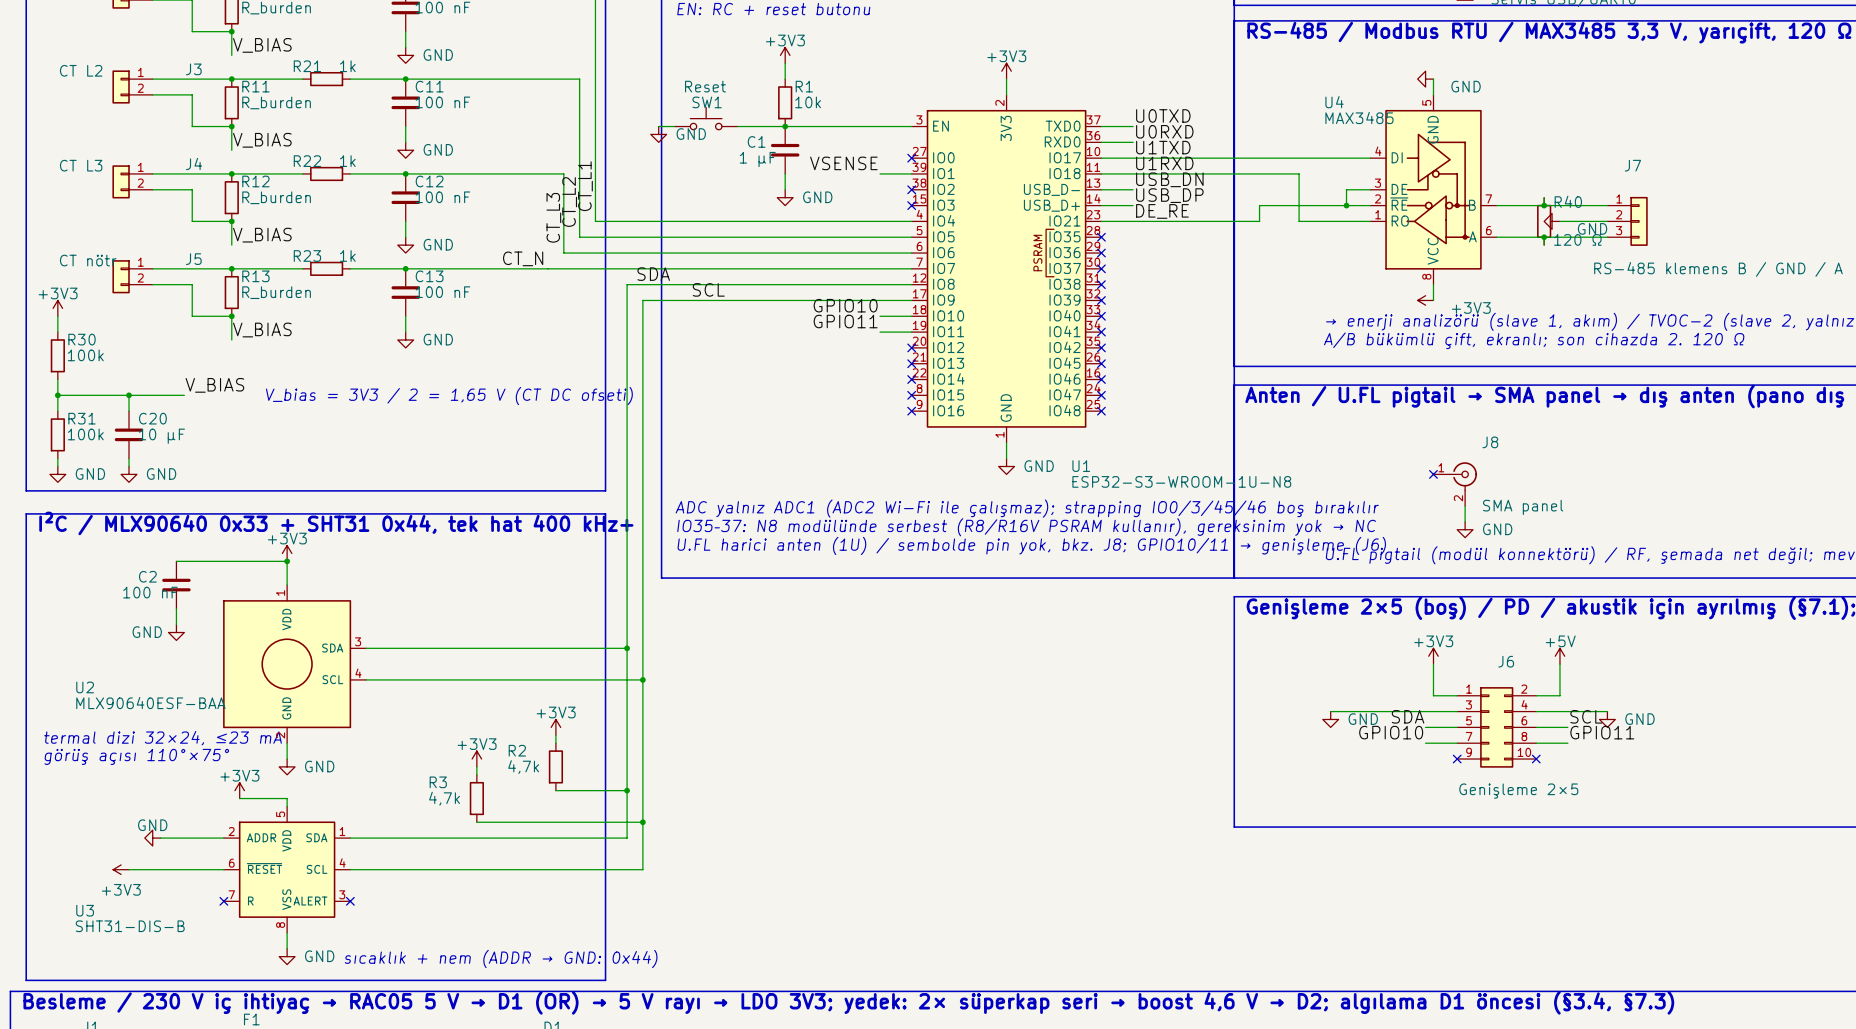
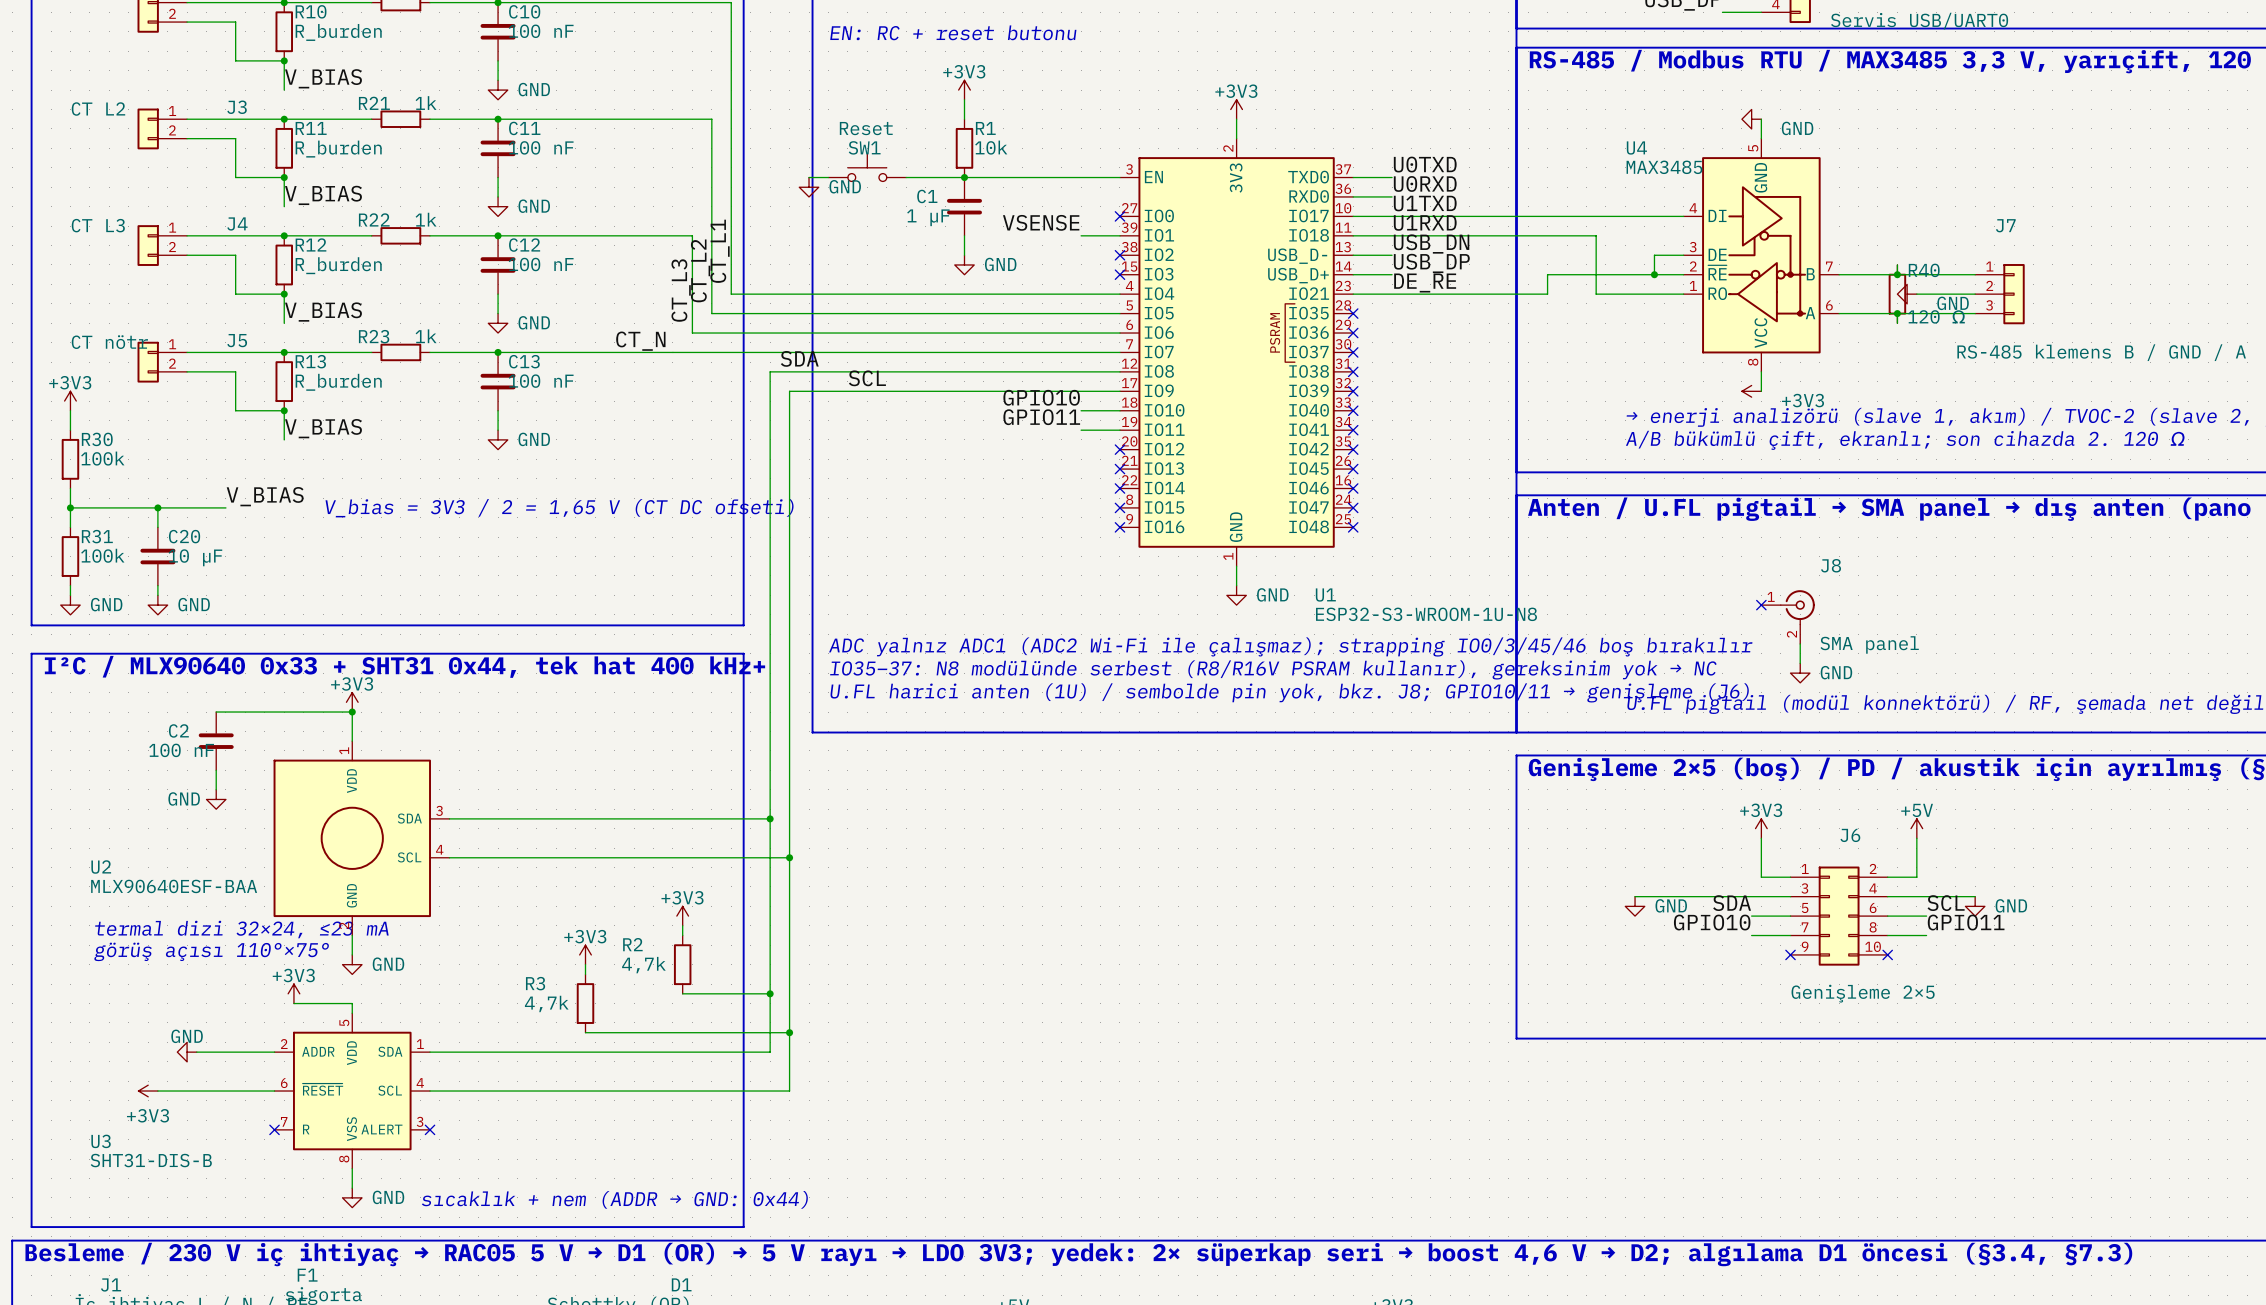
text position: termal dizi 32×24, ≤23 mA (163, 738) -> termal dizi 32×24, ≤23 mA (241, 929)
text position: görüş açısı 110°×75° (136, 756) -> görüş açısı 110°×75° (211, 951)

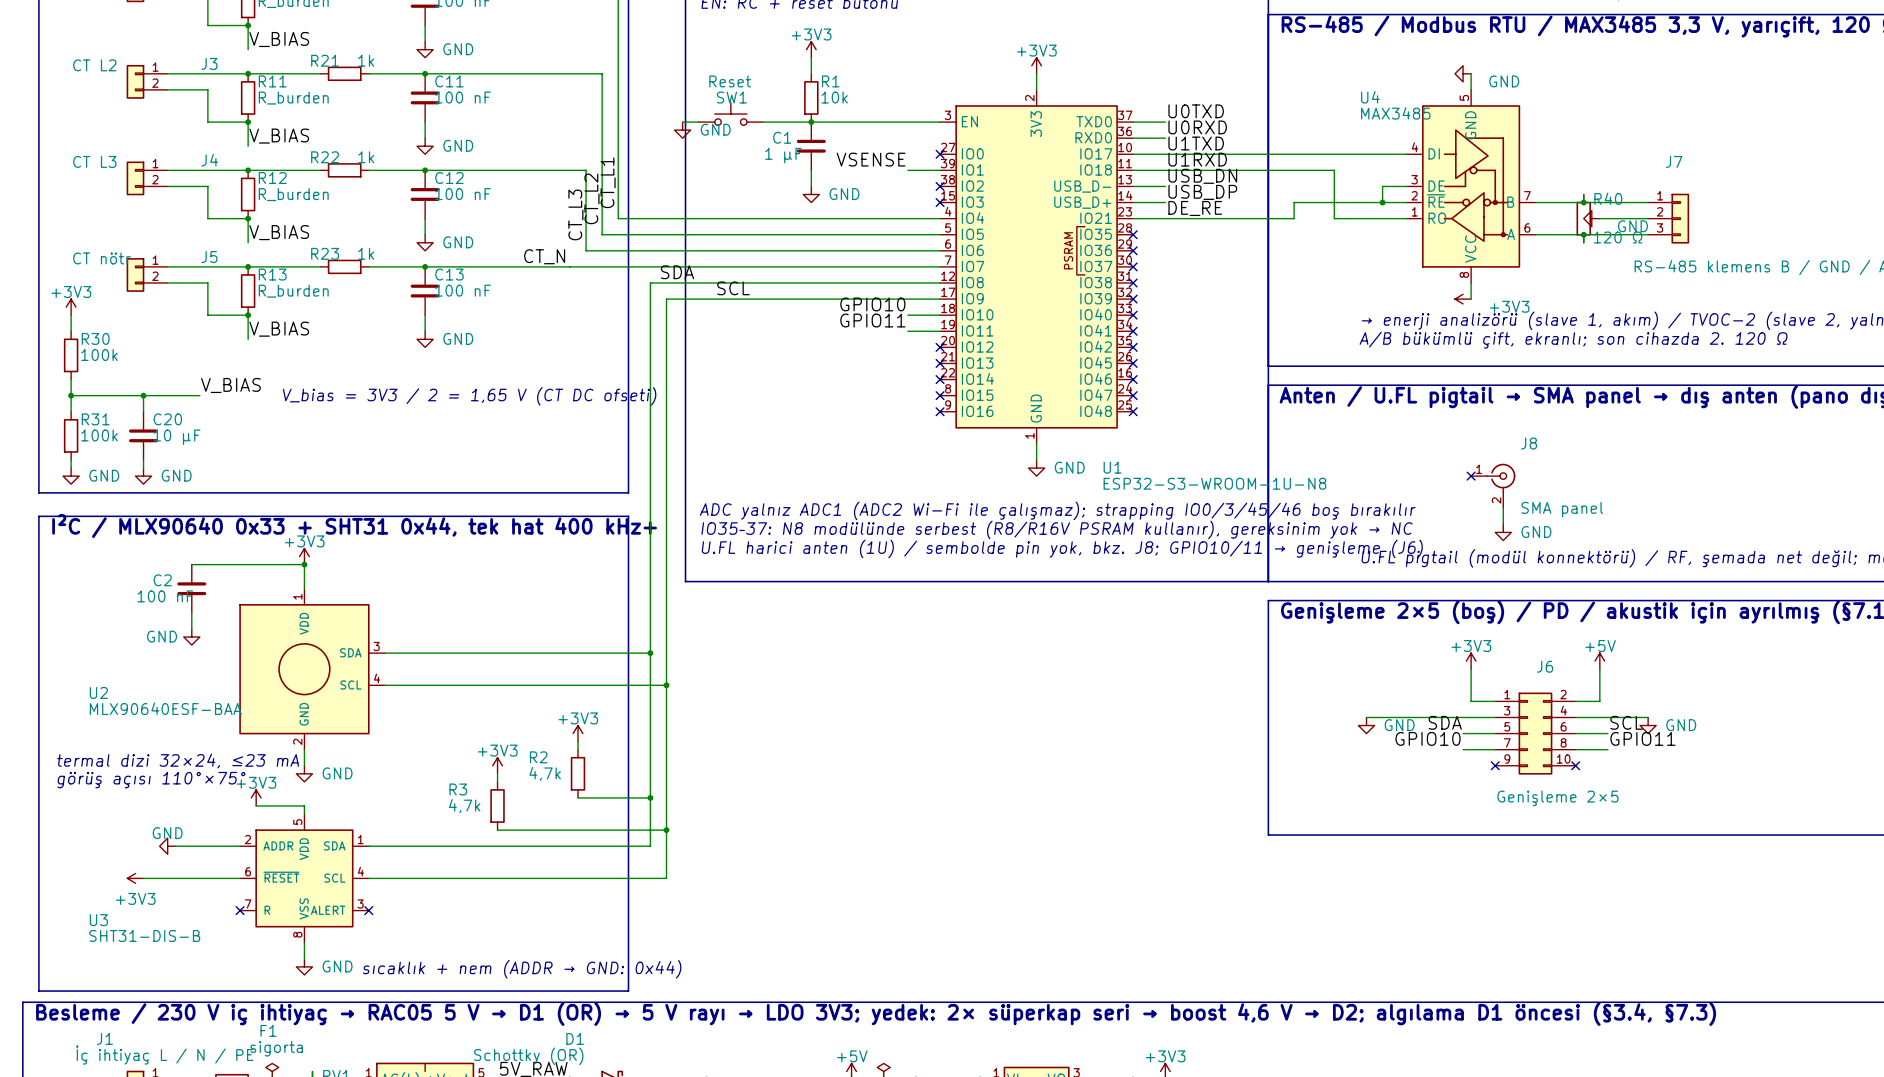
text position: termal dizi 32×24, ≤23 mA (241, 929) -> termal dizi 32×24, ≤23 mA (178, 760)
text position: görüş açısı 110°×75° (211, 951) -> görüş açısı 110°×75° (151, 780)

